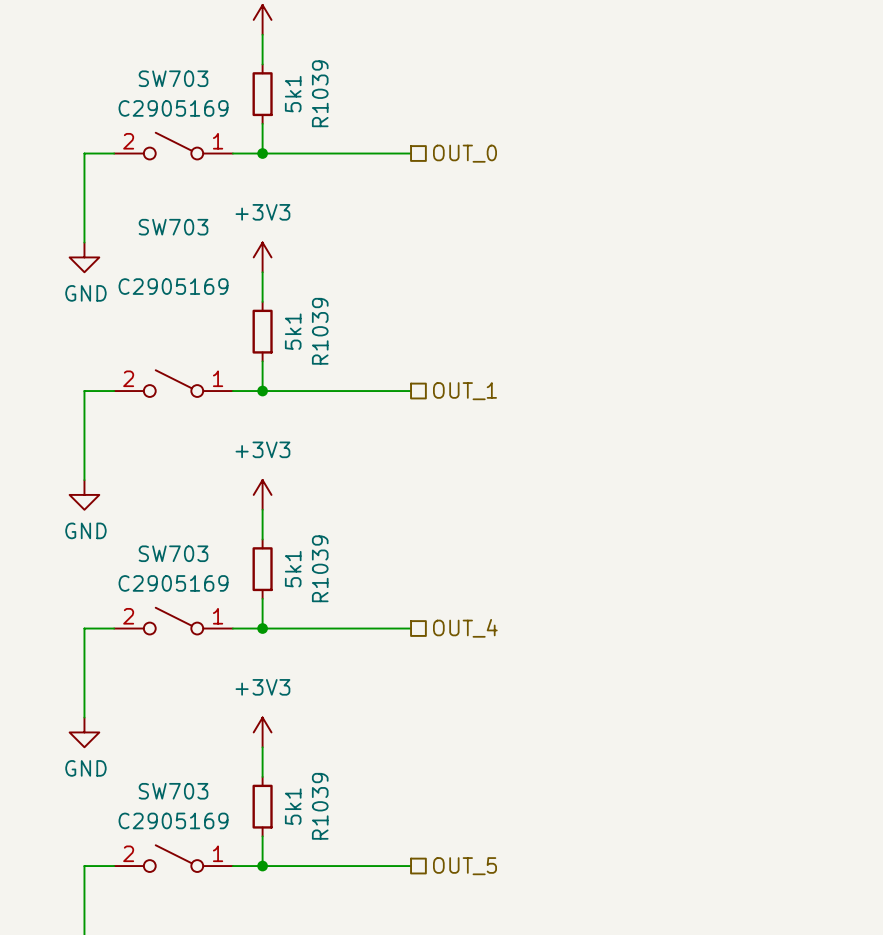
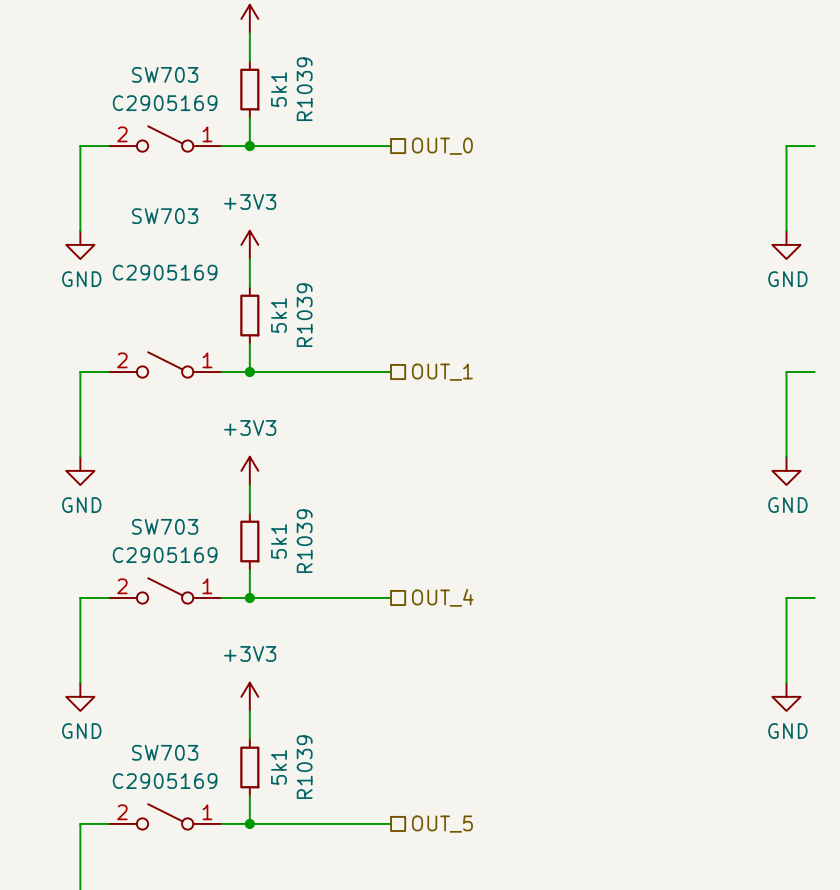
wire: none -> (814, 146) (786, 146) (786, 230)
power symbol: none -> GND (786, 244)
wire: none -> (814, 372) (786, 372) (786, 456)
power symbol: none -> GND (786, 470)
wire: none -> (814, 597) (786, 597) (786, 682)
power symbol: none -> GND (786, 696)

